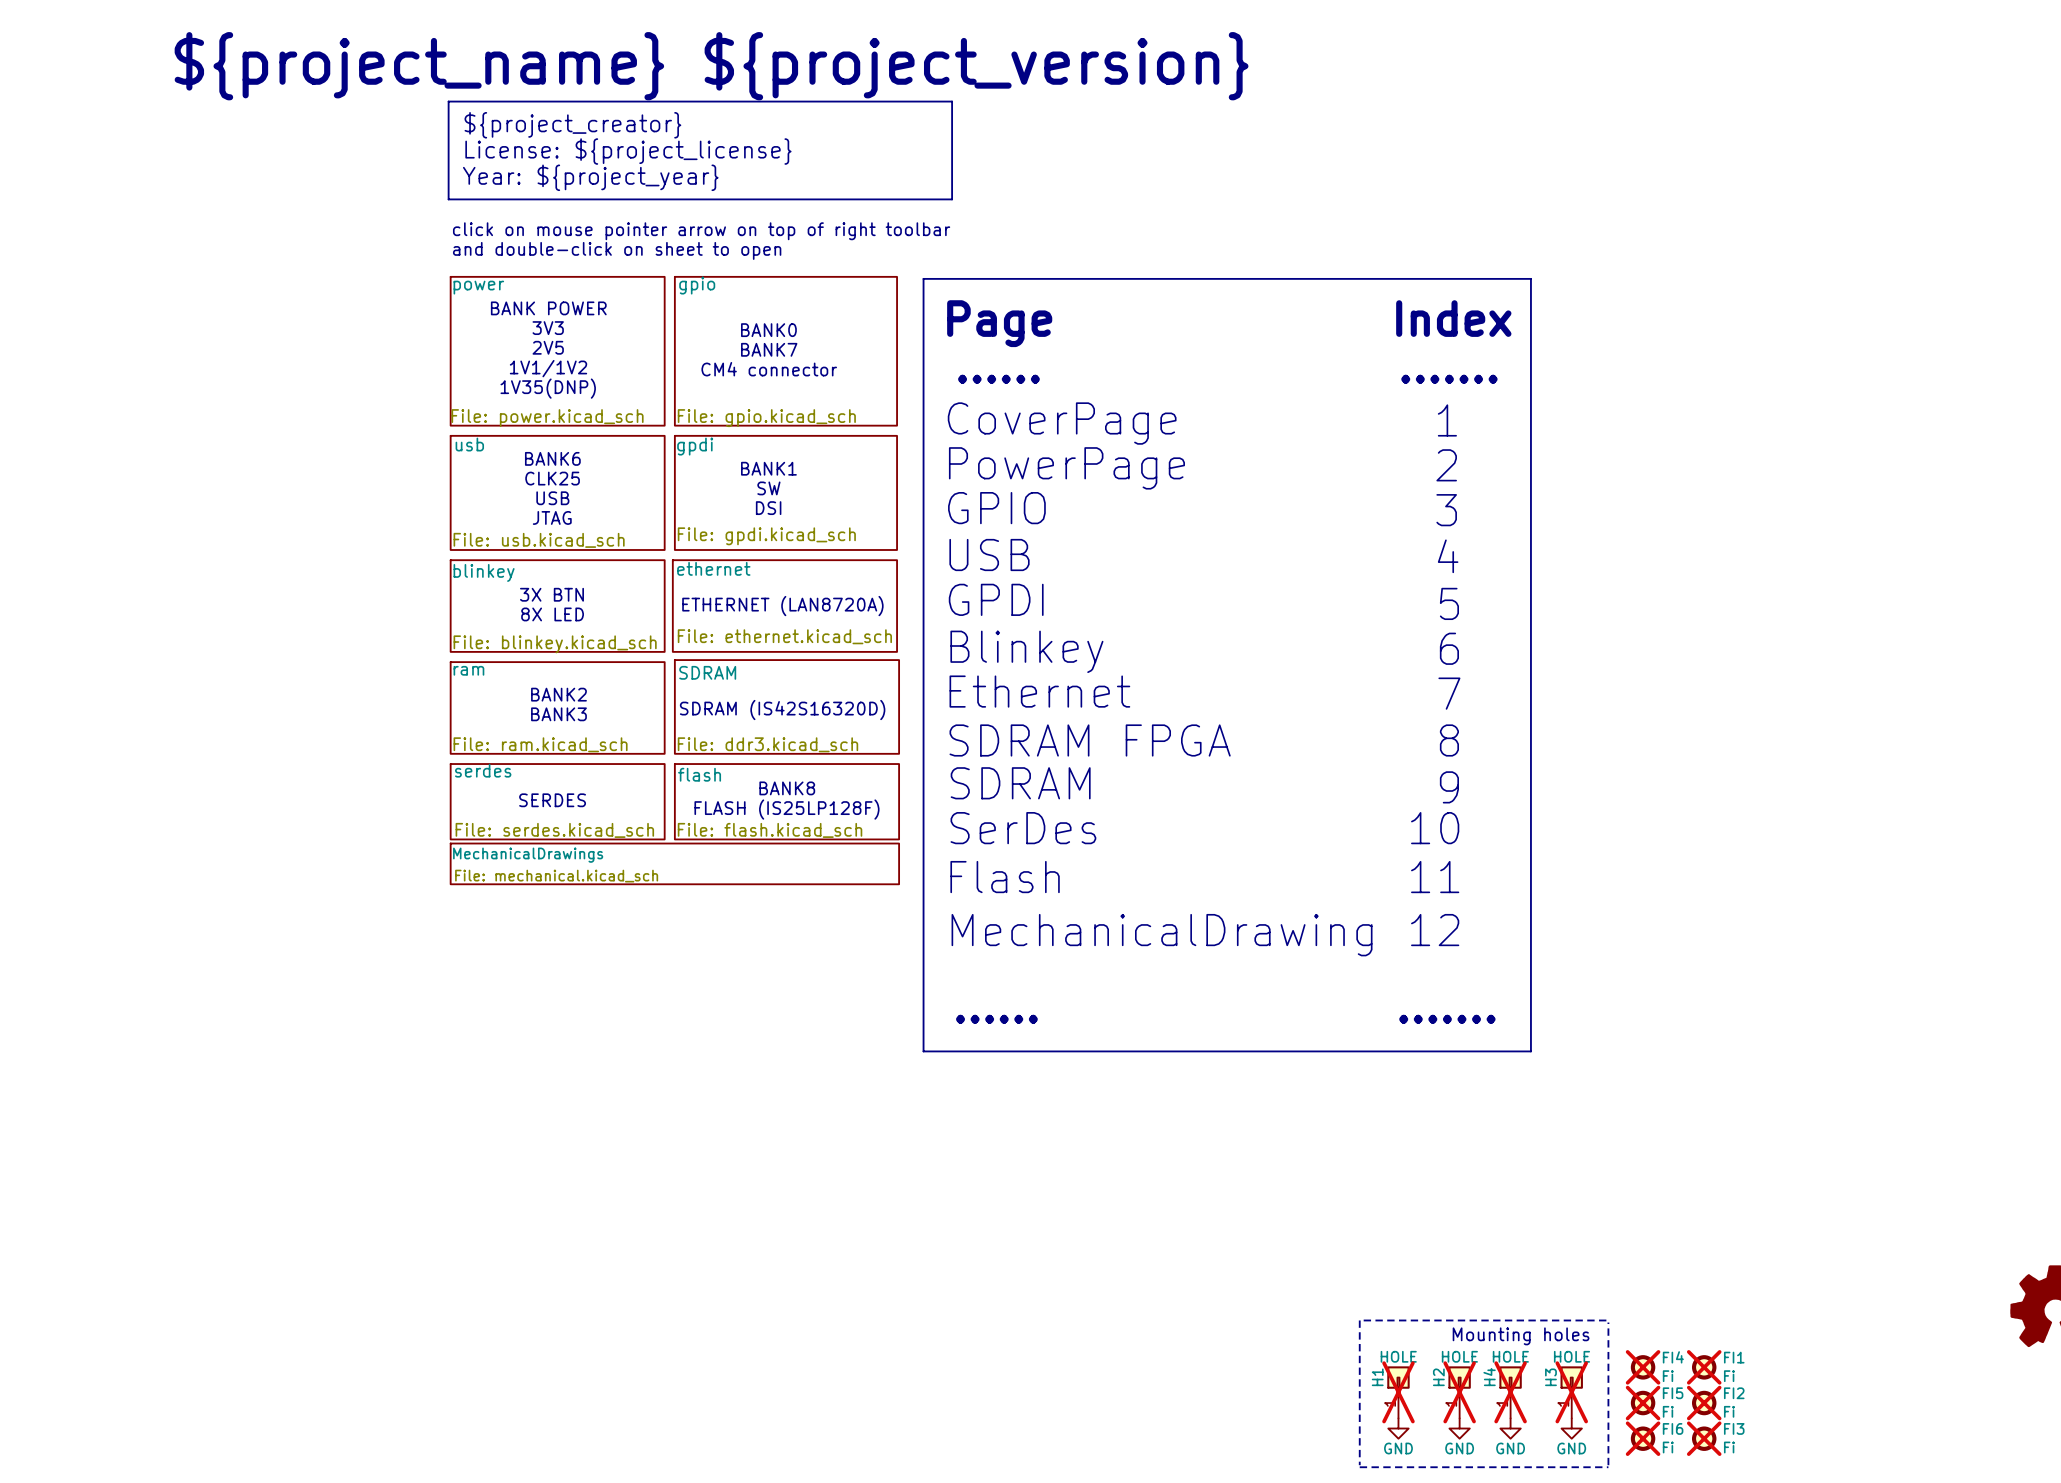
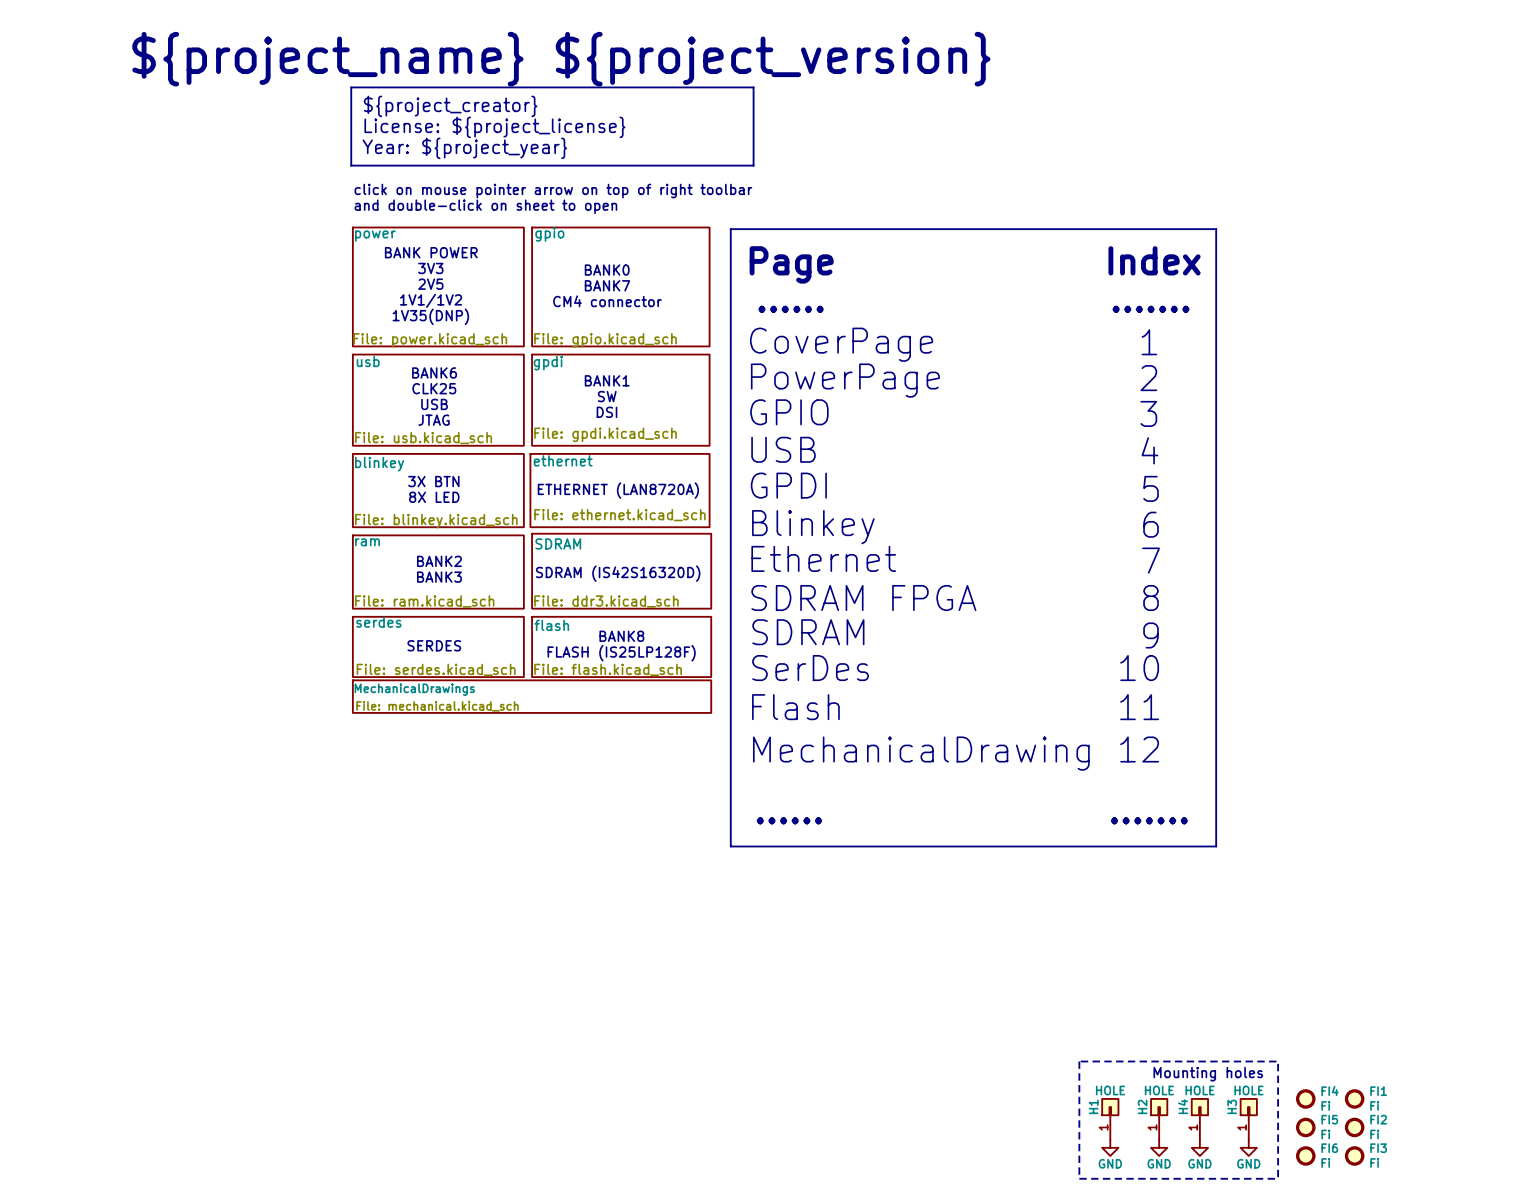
FI4 do-not-place cross: (1643, 1367) -> none
FI1 do-not-place cross: (1704, 1367) -> none
H1 do-not-place cross: (1398, 1392) -> none
H2 do-not-place cross: (1459, 1392) -> none
H4 do-not-place cross: (1510, 1392) -> none
H3 do-not-place cross: (1571, 1392) -> none
FI5 do-not-place cross: (1643, 1403) -> none
FI2 do-not-place cross: (1704, 1403) -> none
FI6 do-not-place cross: (1643, 1438) -> none
FI3 do-not-place cross: (1704, 1438) -> none

